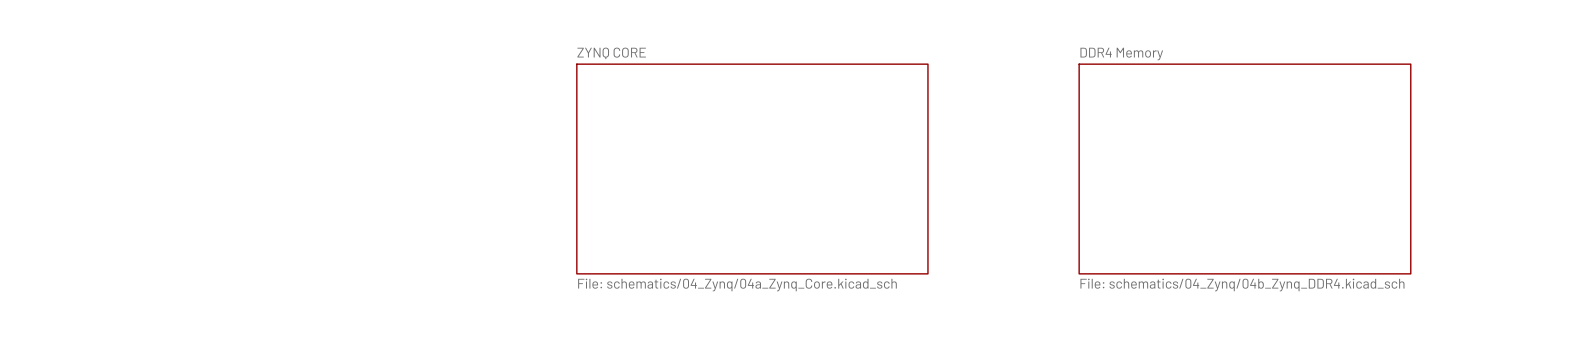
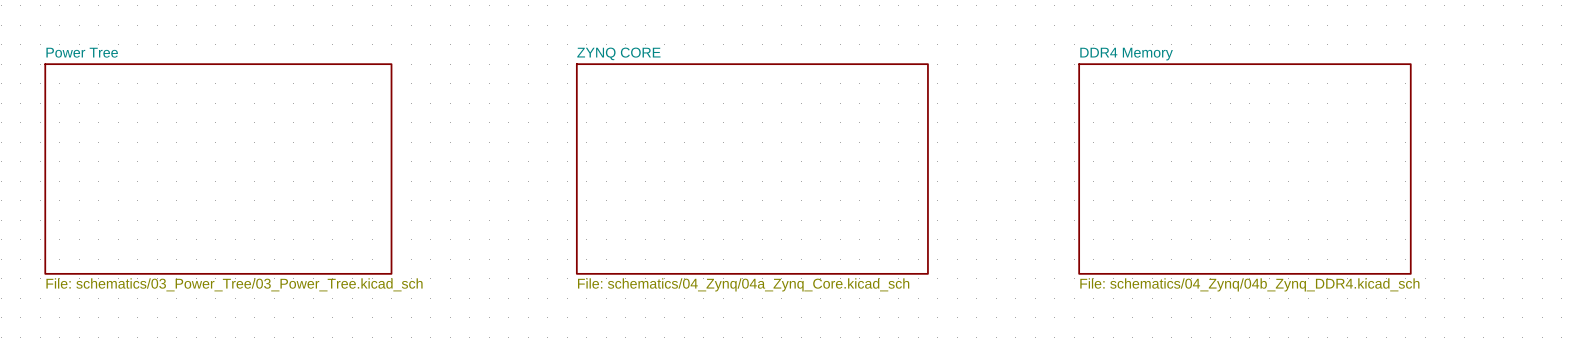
sheet Power Tree: none -> File: schematics/03_Power_Tree/03_Power_Tree.kicad_sch (218, 169)

